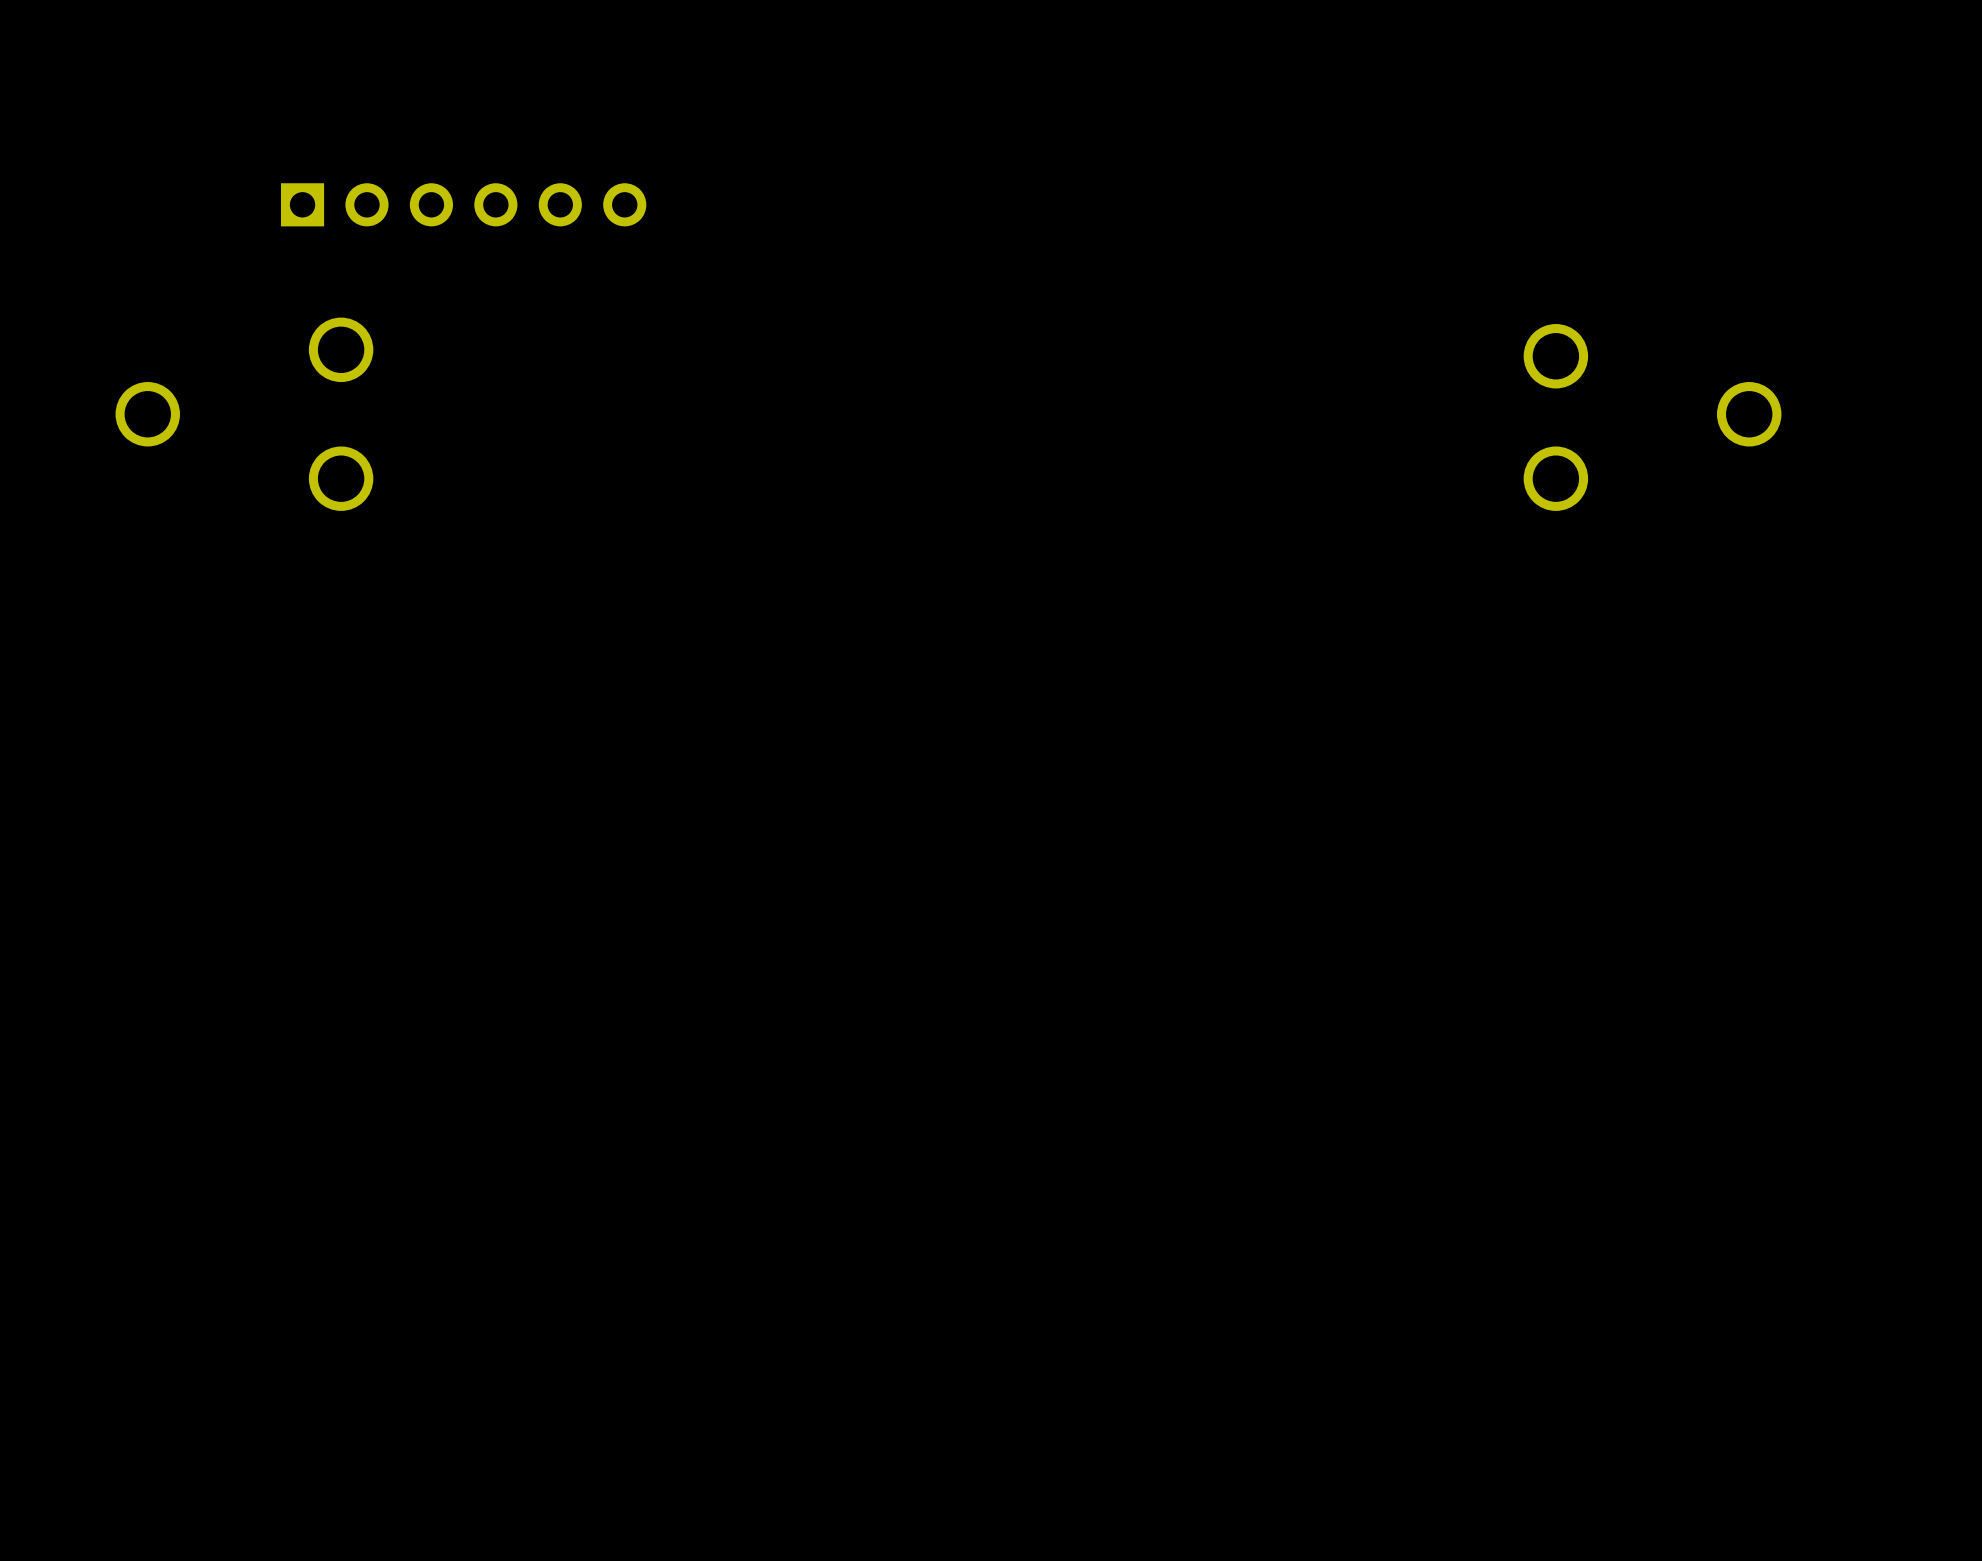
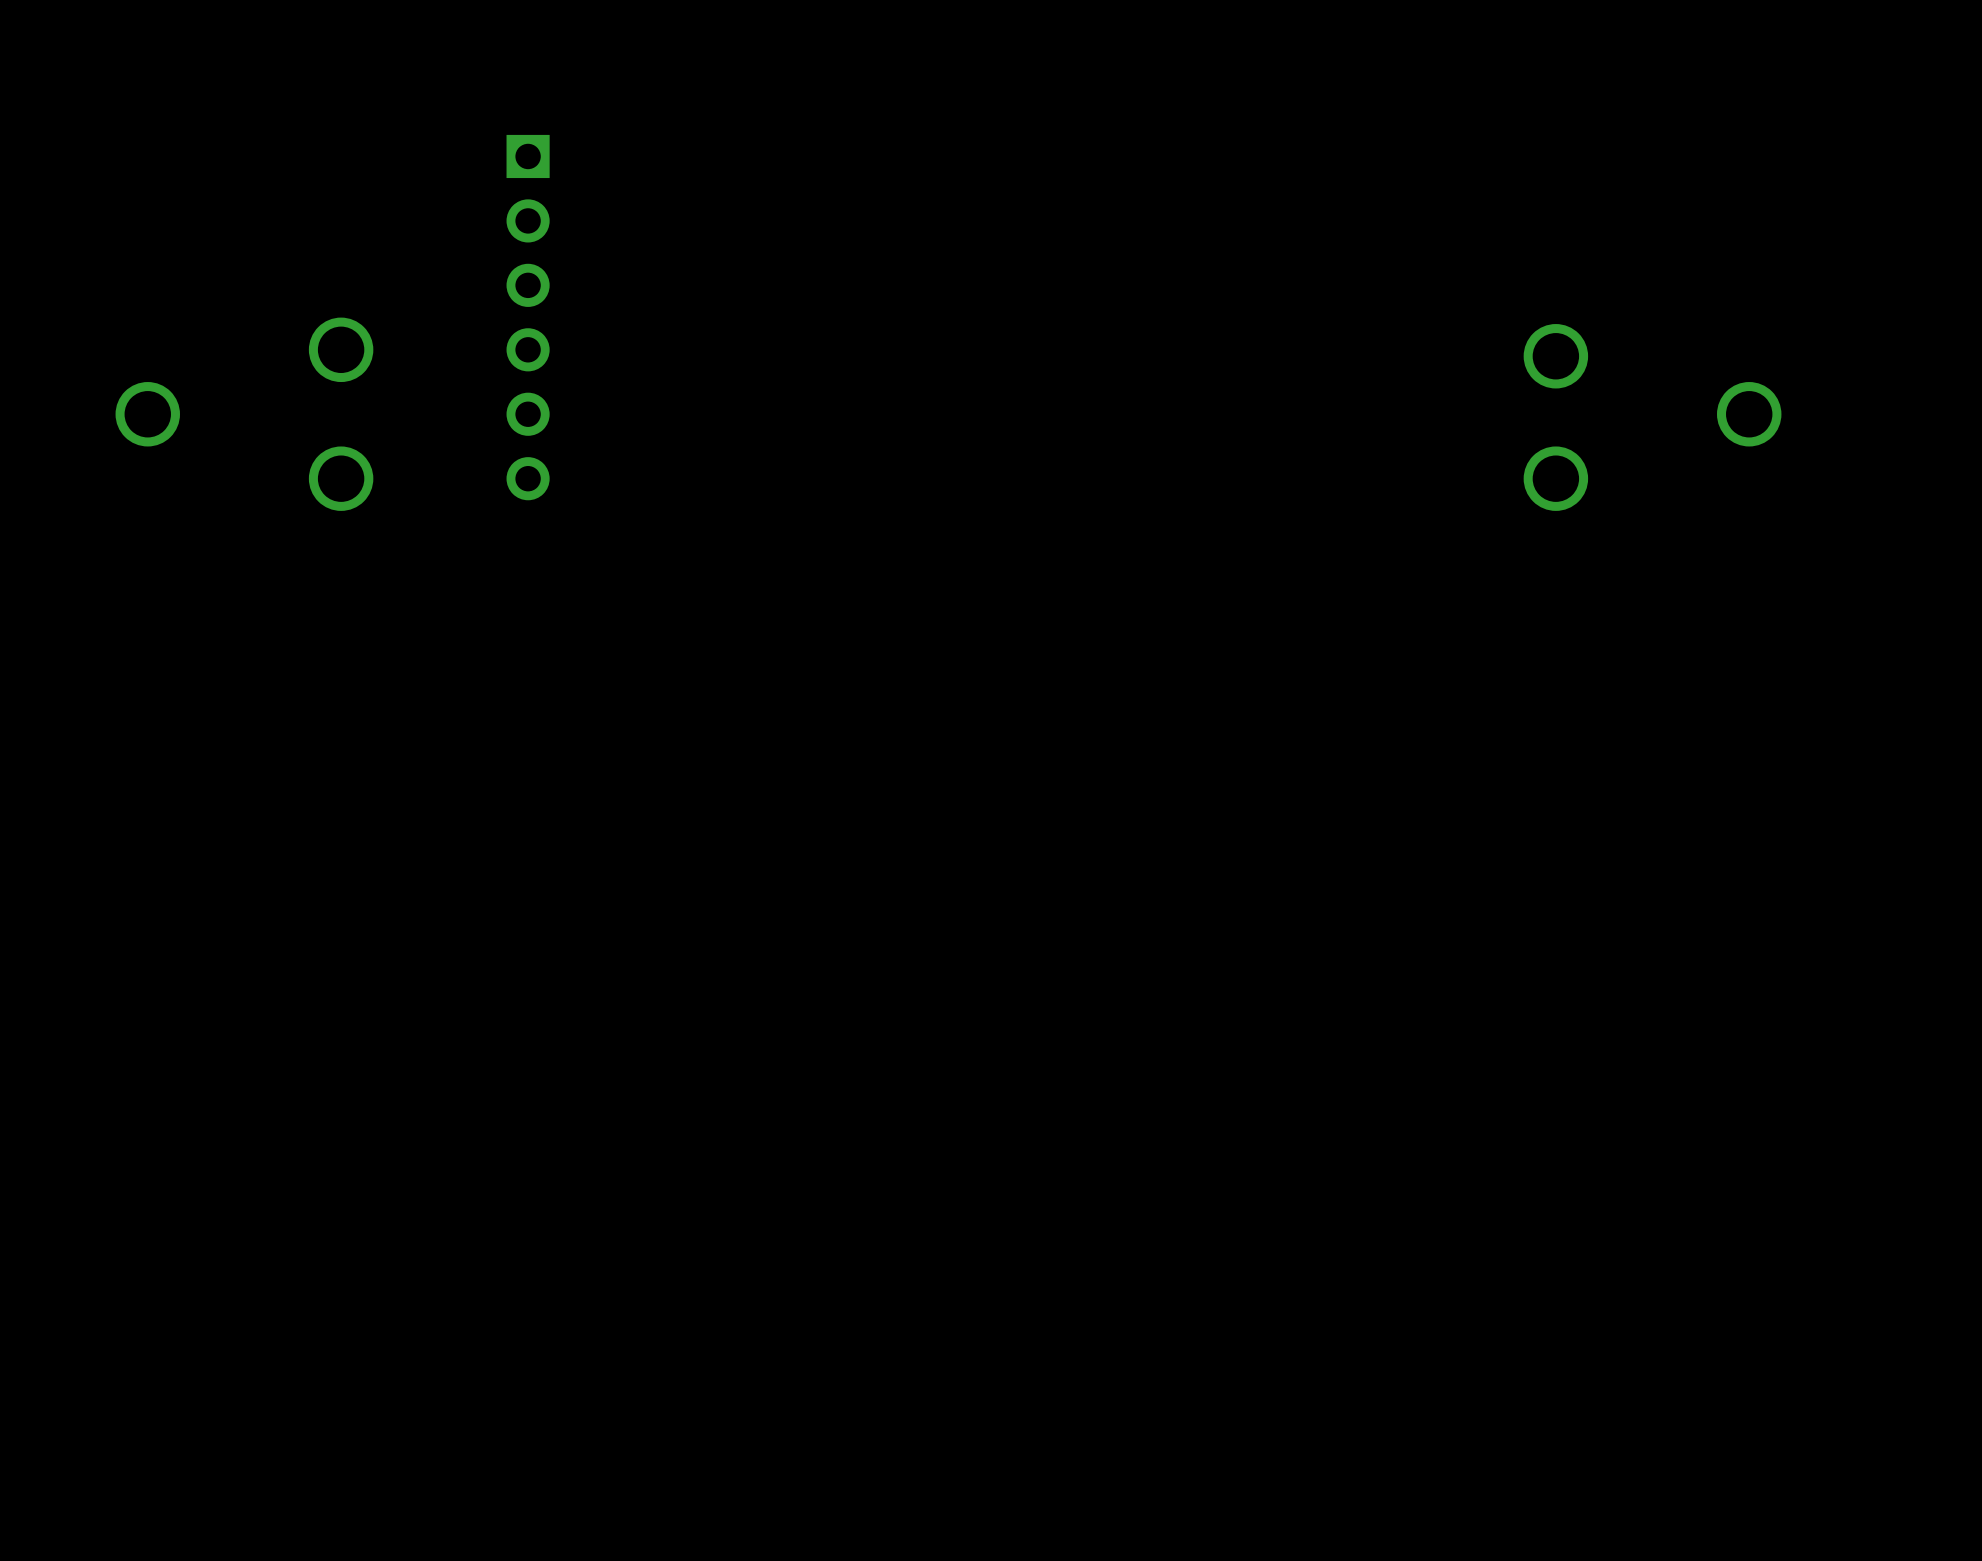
part rotation: 0° (463, 204) -> 90° clockwise (528, 317)

